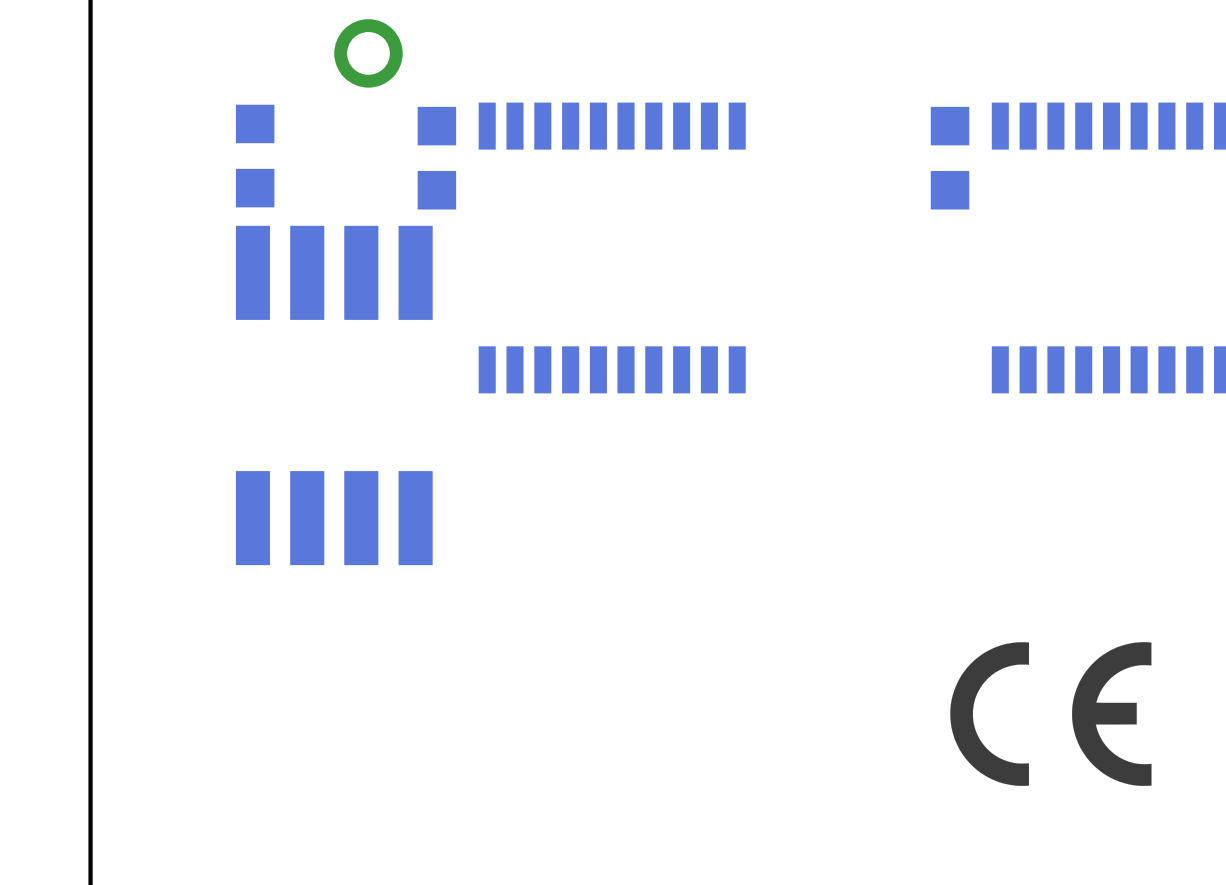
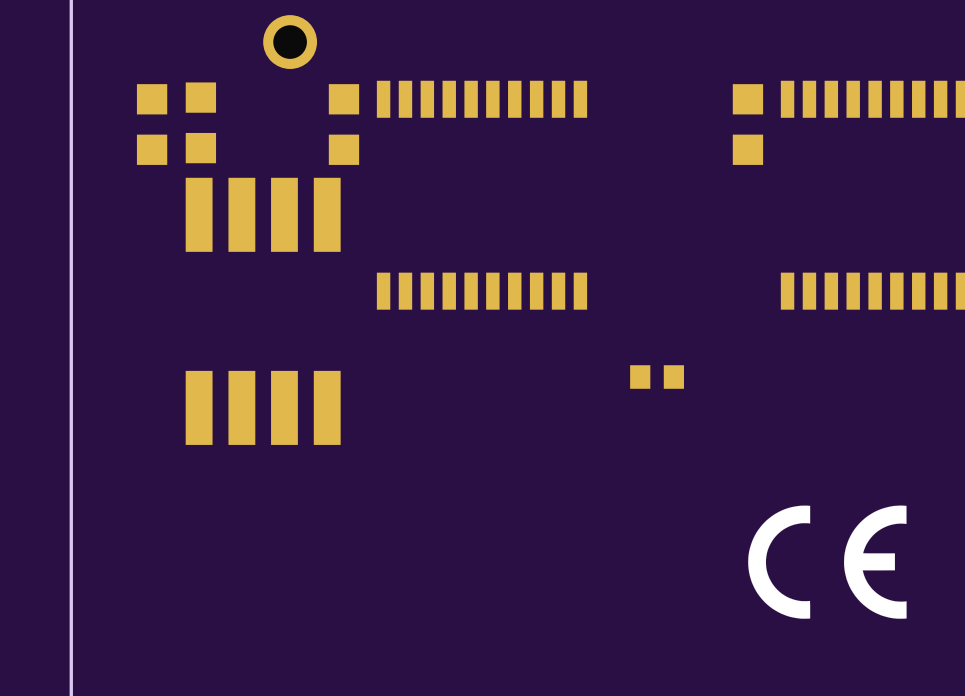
part: none -> (152, 124)
part: none -> (657, 377)

